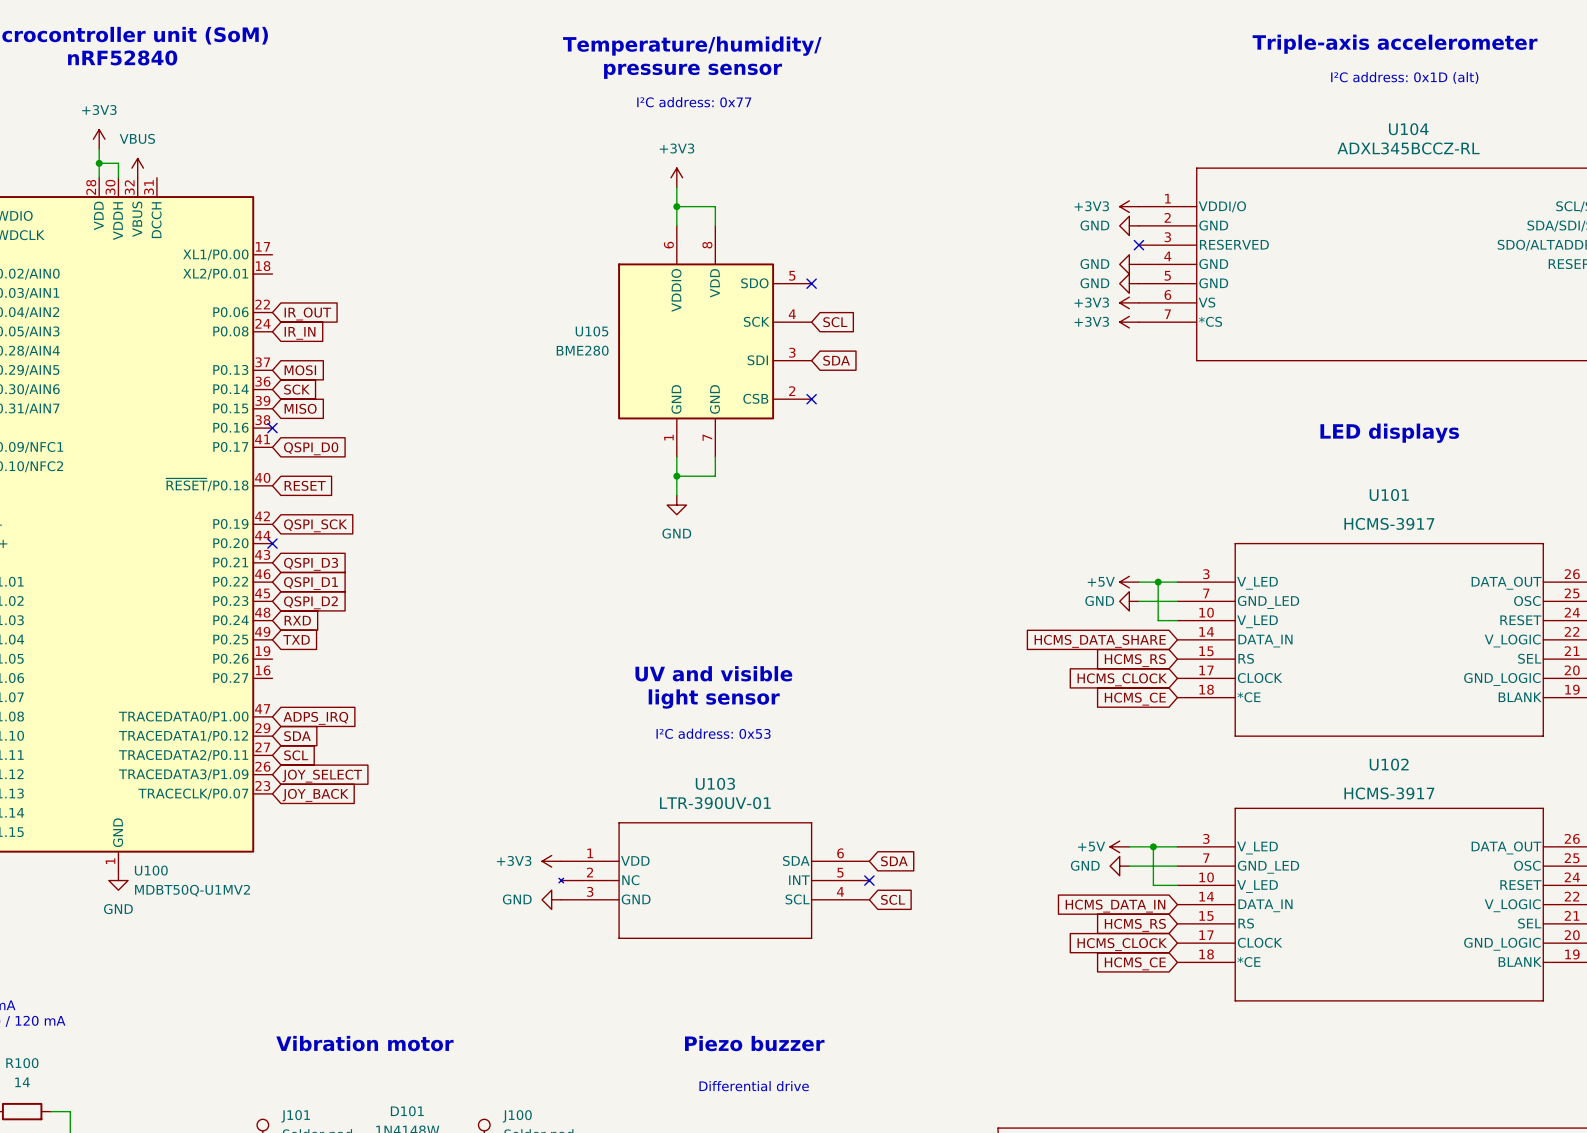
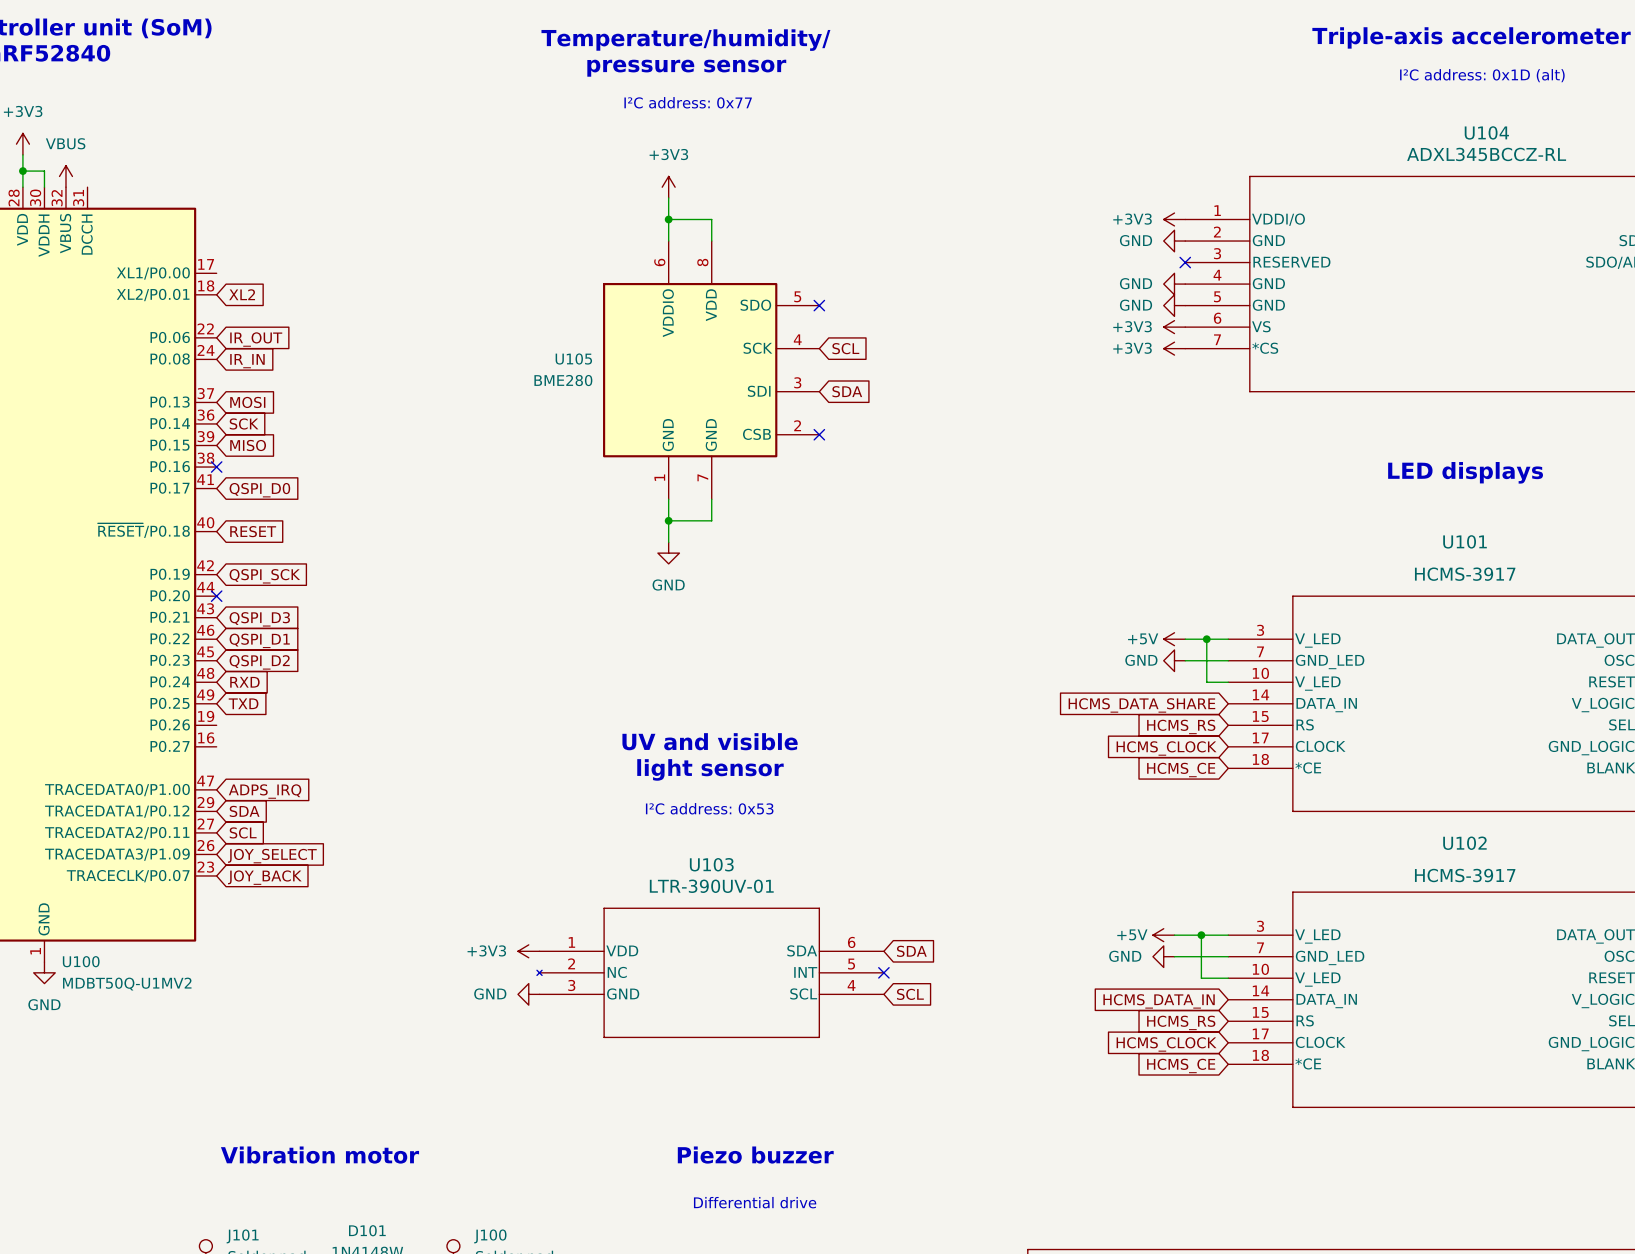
global label: none -> XL2 (242, 294)

